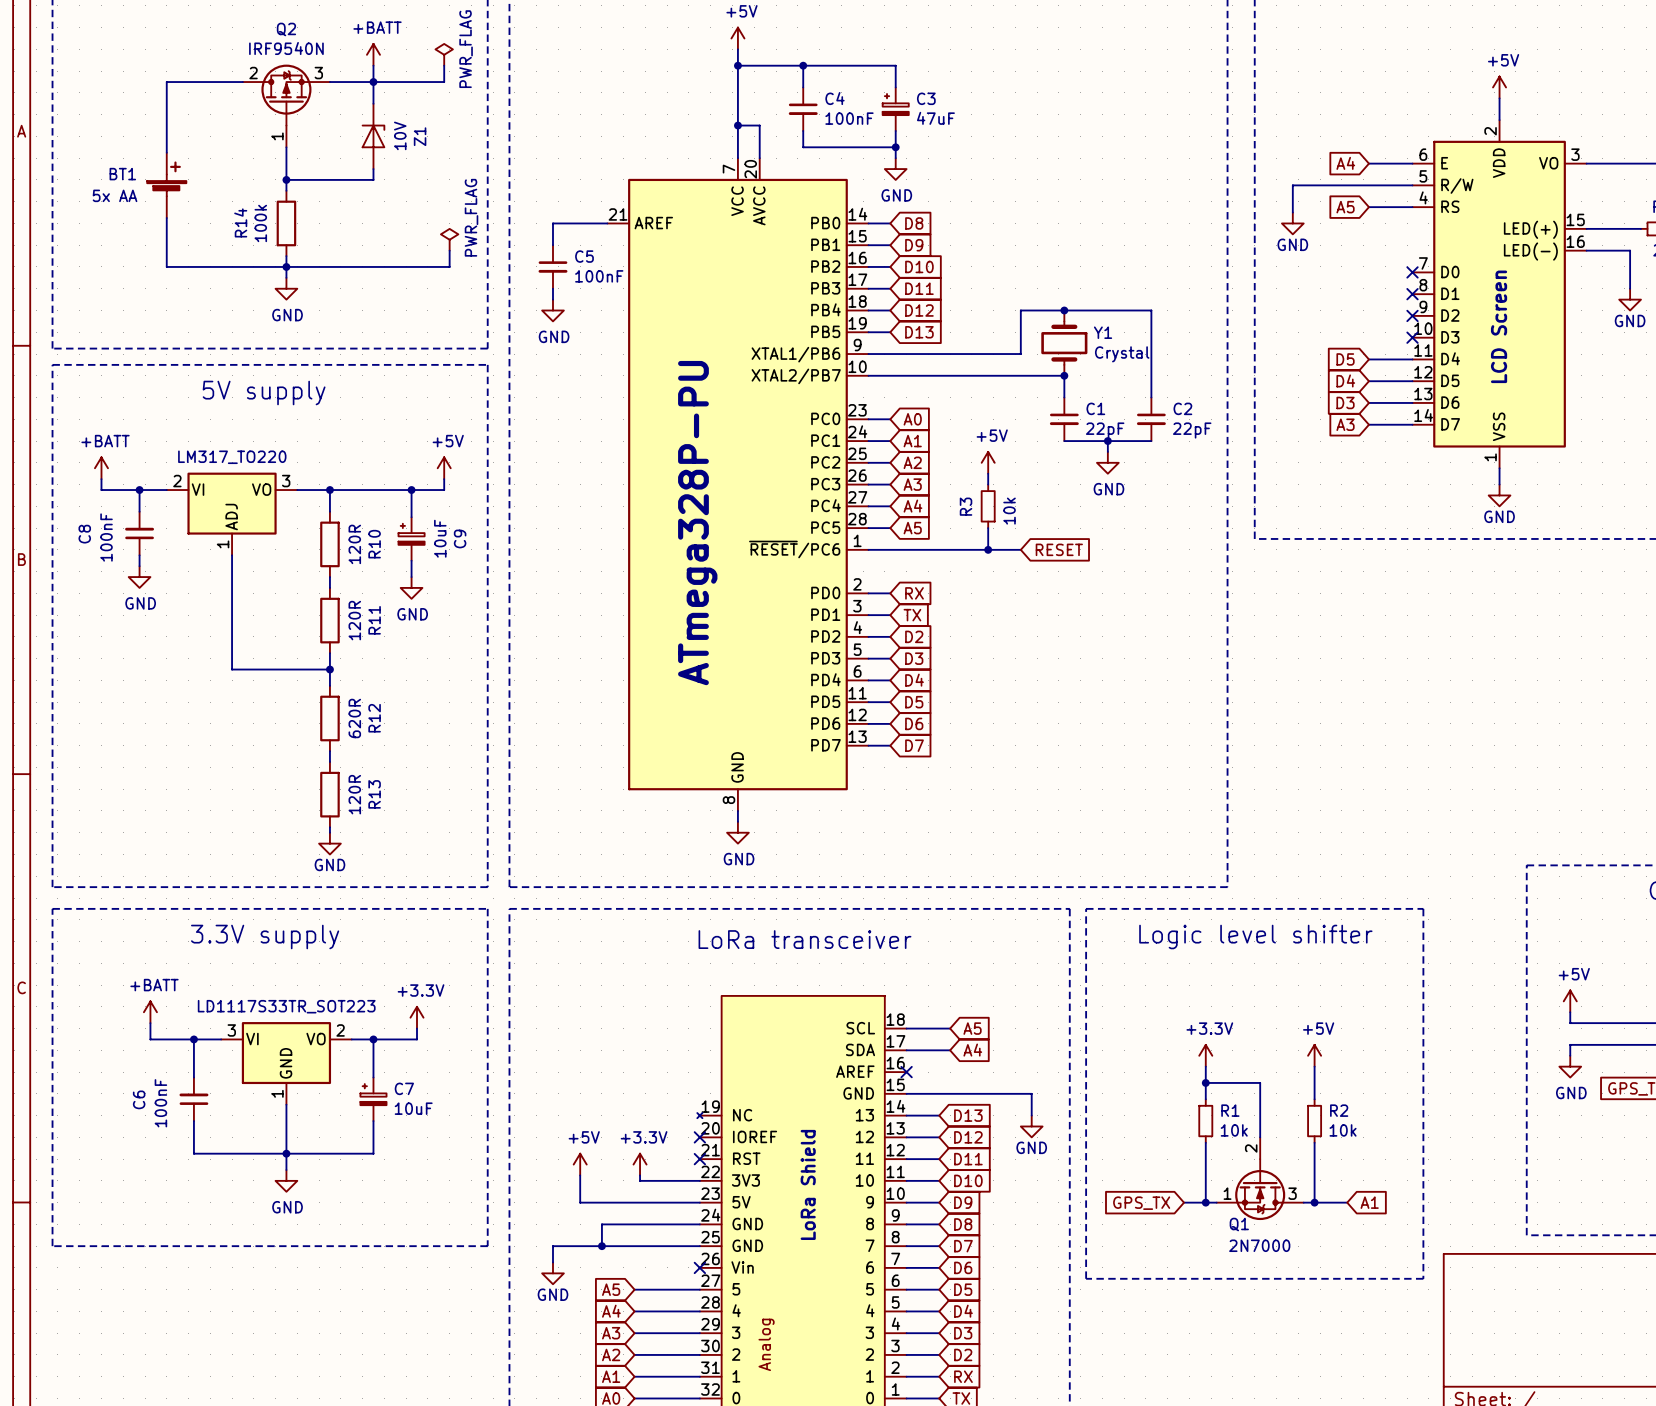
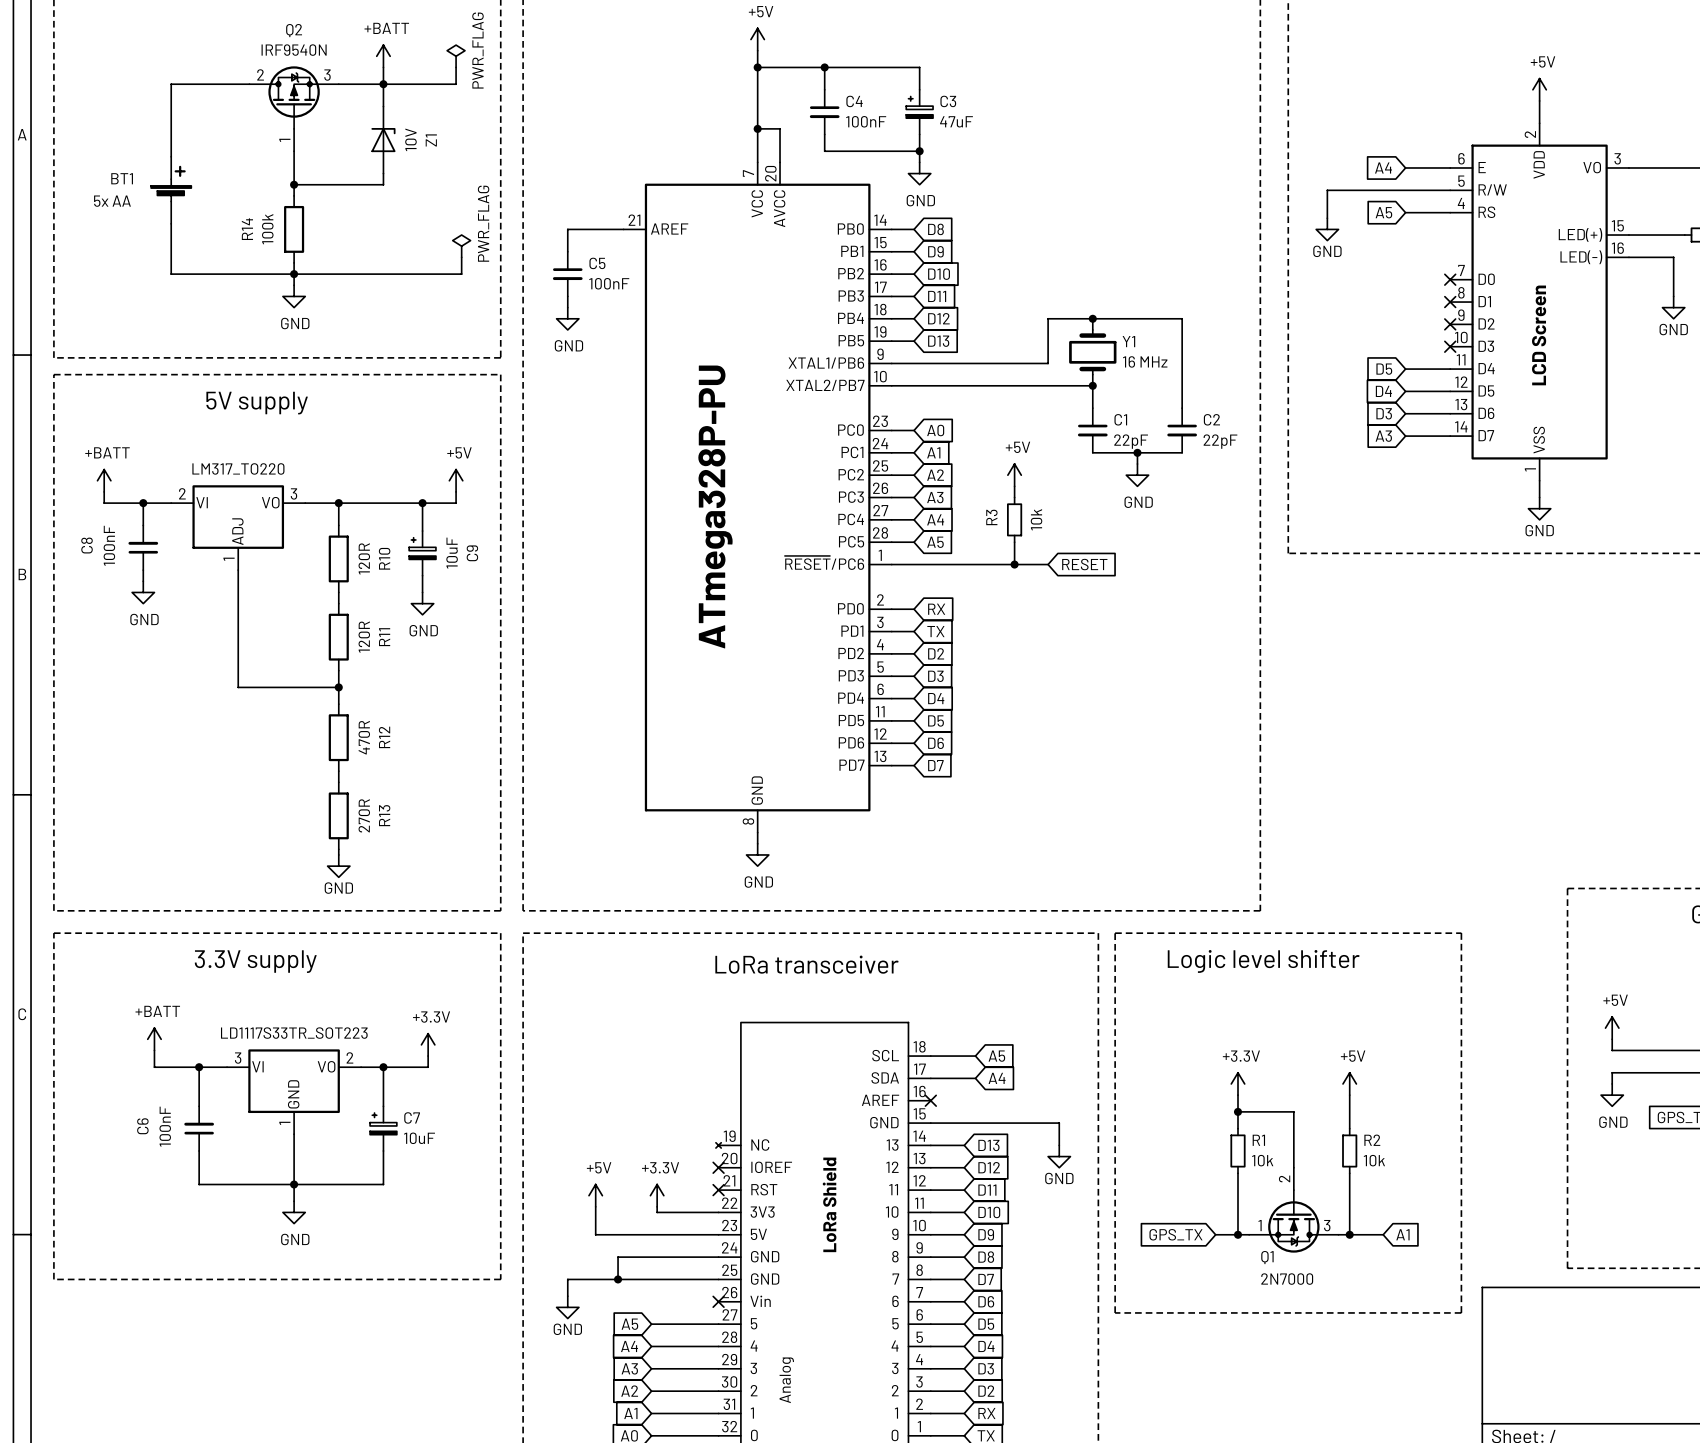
Y1 value: Crystal (1122, 354) -> 16 MHz (1145, 361)
R12 value: 620R (354, 718) -> 470R (364, 737)
R13 value: 120R (354, 794) -> 270R (364, 815)

